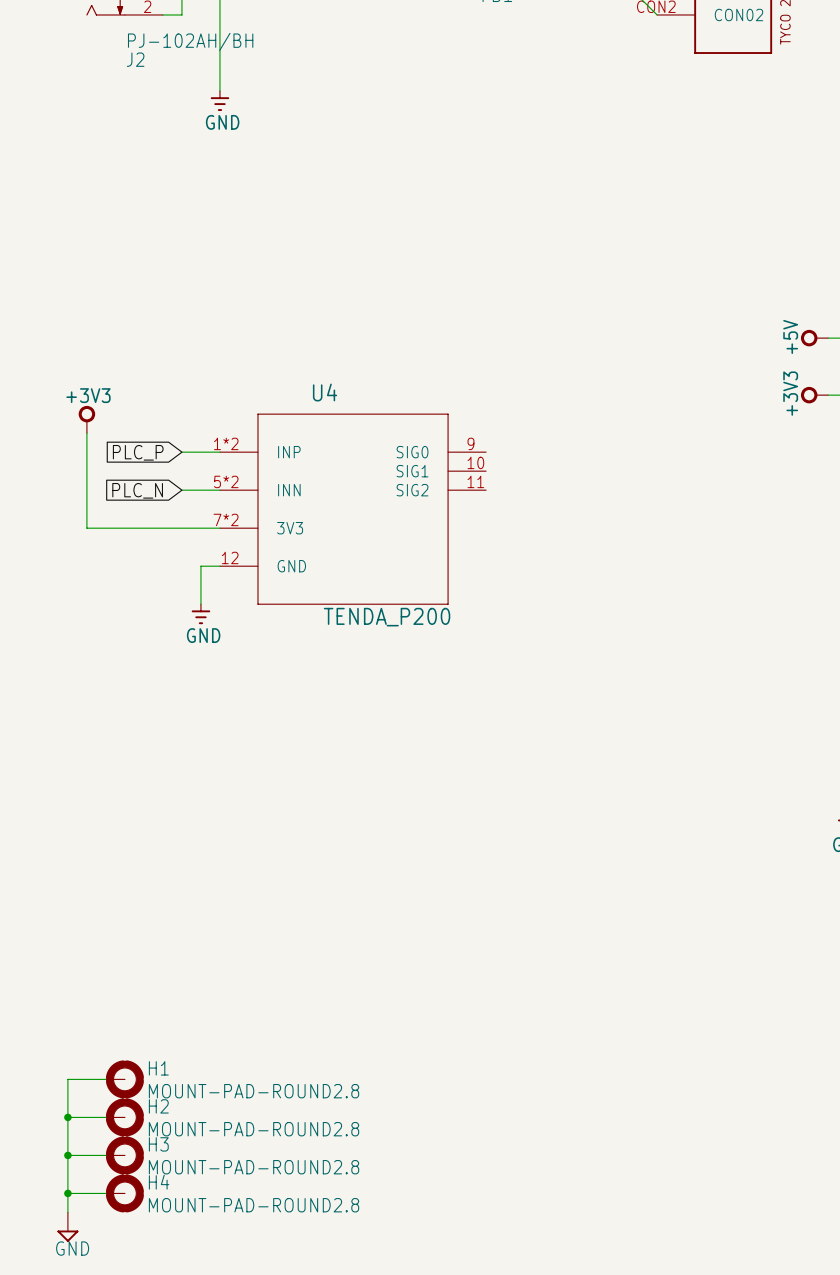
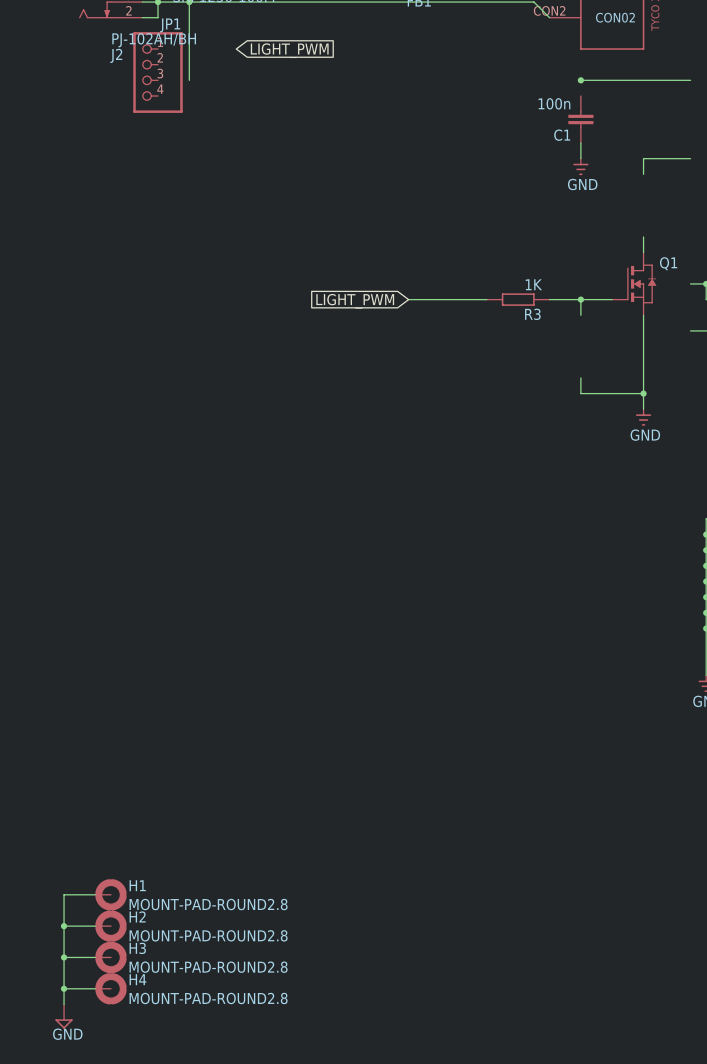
global label: none -> LIGHT_PWM (289, 50)
JP1: none -> (158, 72)
wire: none -> (580, 80) (690, 80)
junction: none -> (580, 80)
power symbol: GND (219, 100) -> none
C1: none -> 100n (580, 119)
wire: none -> (580, 142) (580, 158)
wire: none -> (690, 158) (643, 158) (643, 174)
power symbol: none -> GND (580, 166)
wire: none -> (643, 236) (643, 252)
Q1: none -> (634, 283)
power symbol: +5V (814, 338) -> none
global label: none -> LIGHT_PWM (355, 301)
wire: none -> (408, 299) (486, 299)
R3: none -> 1K (518, 299)
wire: none -> (549, 299) (612, 299)
wire: none -> (580, 299) (580, 315)
junction: none -> (580, 299)
wire: none -> (643, 315) (643, 409)
power symbol: +3V3 (814, 395) -> none
power symbol: +3V3 (86, 419) -> none
wire: (86, 433) (86, 528) (219, 528) -> none
global label: PLC_P (138, 452) -> none
wire: (181, 452) (219, 452) -> none
wire: none -> (580, 377) (580, 393) (643, 393)
junction: none -> (643, 393)
global label: PLC_N (137, 490) -> none
wire: (181, 490) (219, 490) -> none
power symbol: none -> GND (643, 417)
U4: TENDA_P200 (353, 509) -> none
wire: (219, 566) (200, 566) (200, 604) -> none
power symbol: GND (200, 613) -> none

